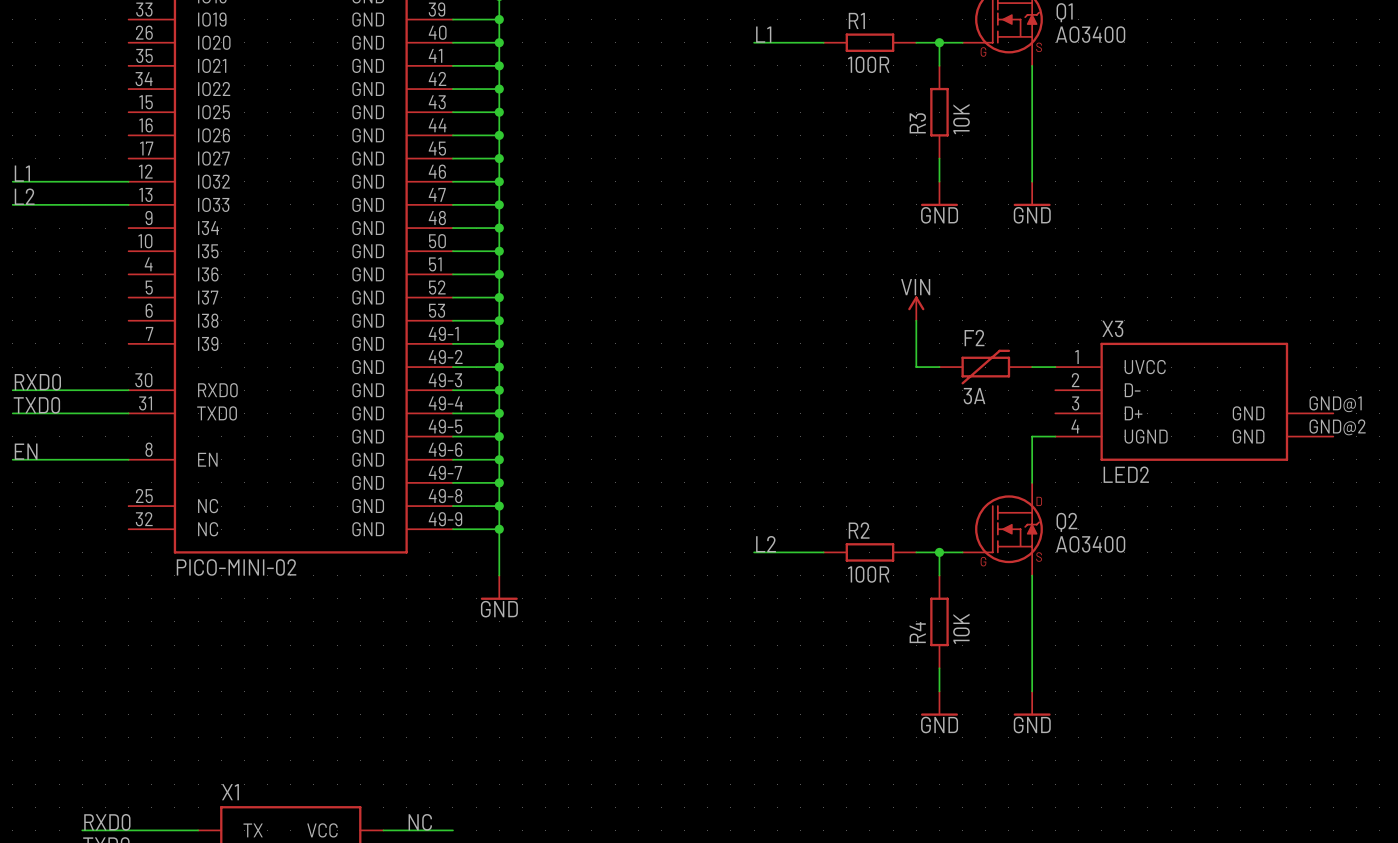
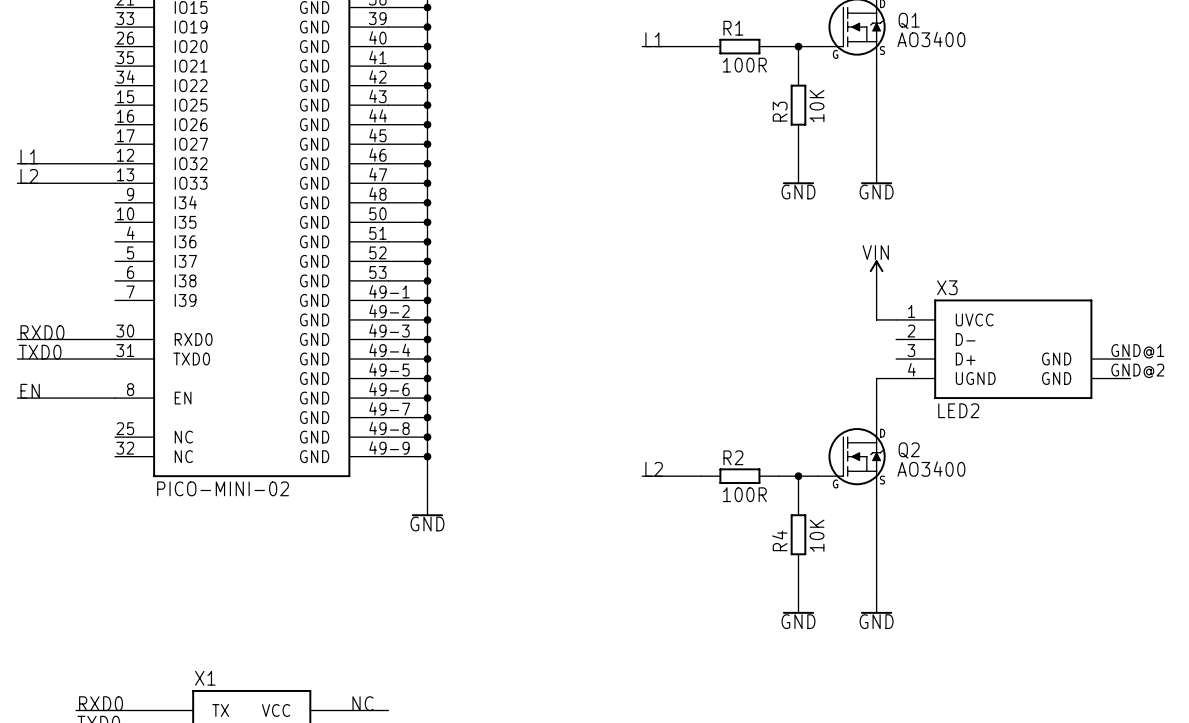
power symbol position: VIN (916, 308) -> VIN (876, 270)
wire: (916, 320) (916, 367) (939, 367) -> none
wire: none -> (876, 280) (876, 319)
F2: 3A (985, 367) -> none

